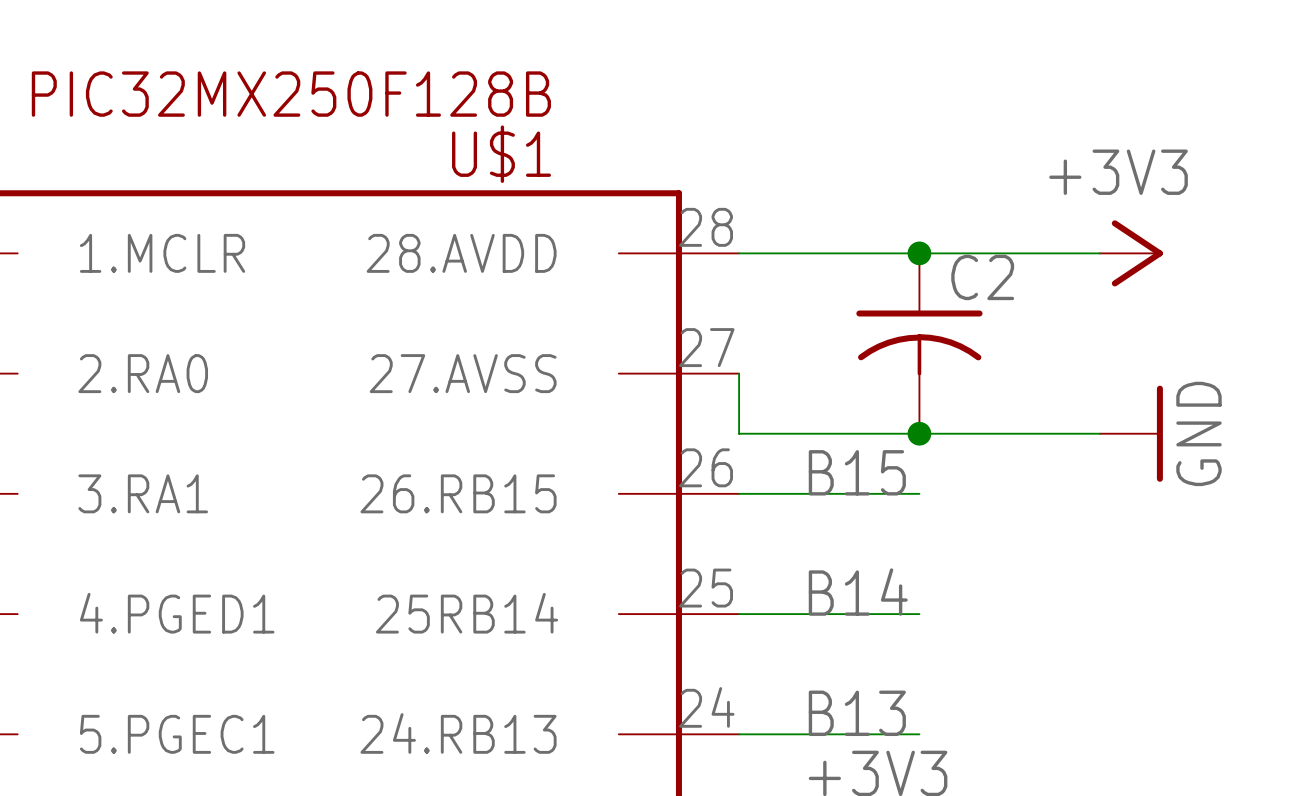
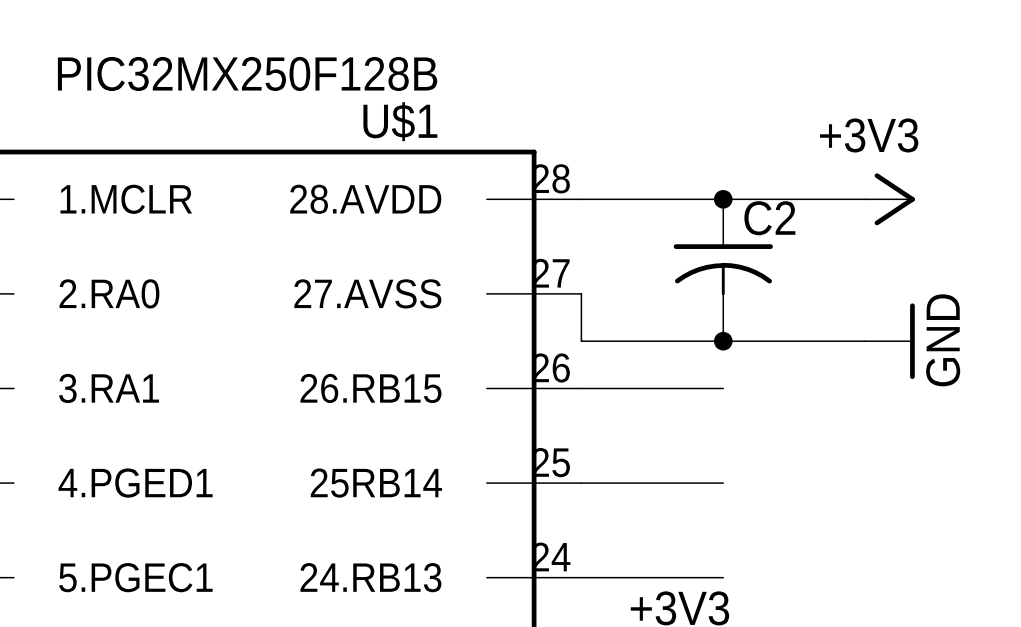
label: B15 (857, 472) -> none
label: B14 (858, 592) -> none
label: B13 (857, 713) -> none

